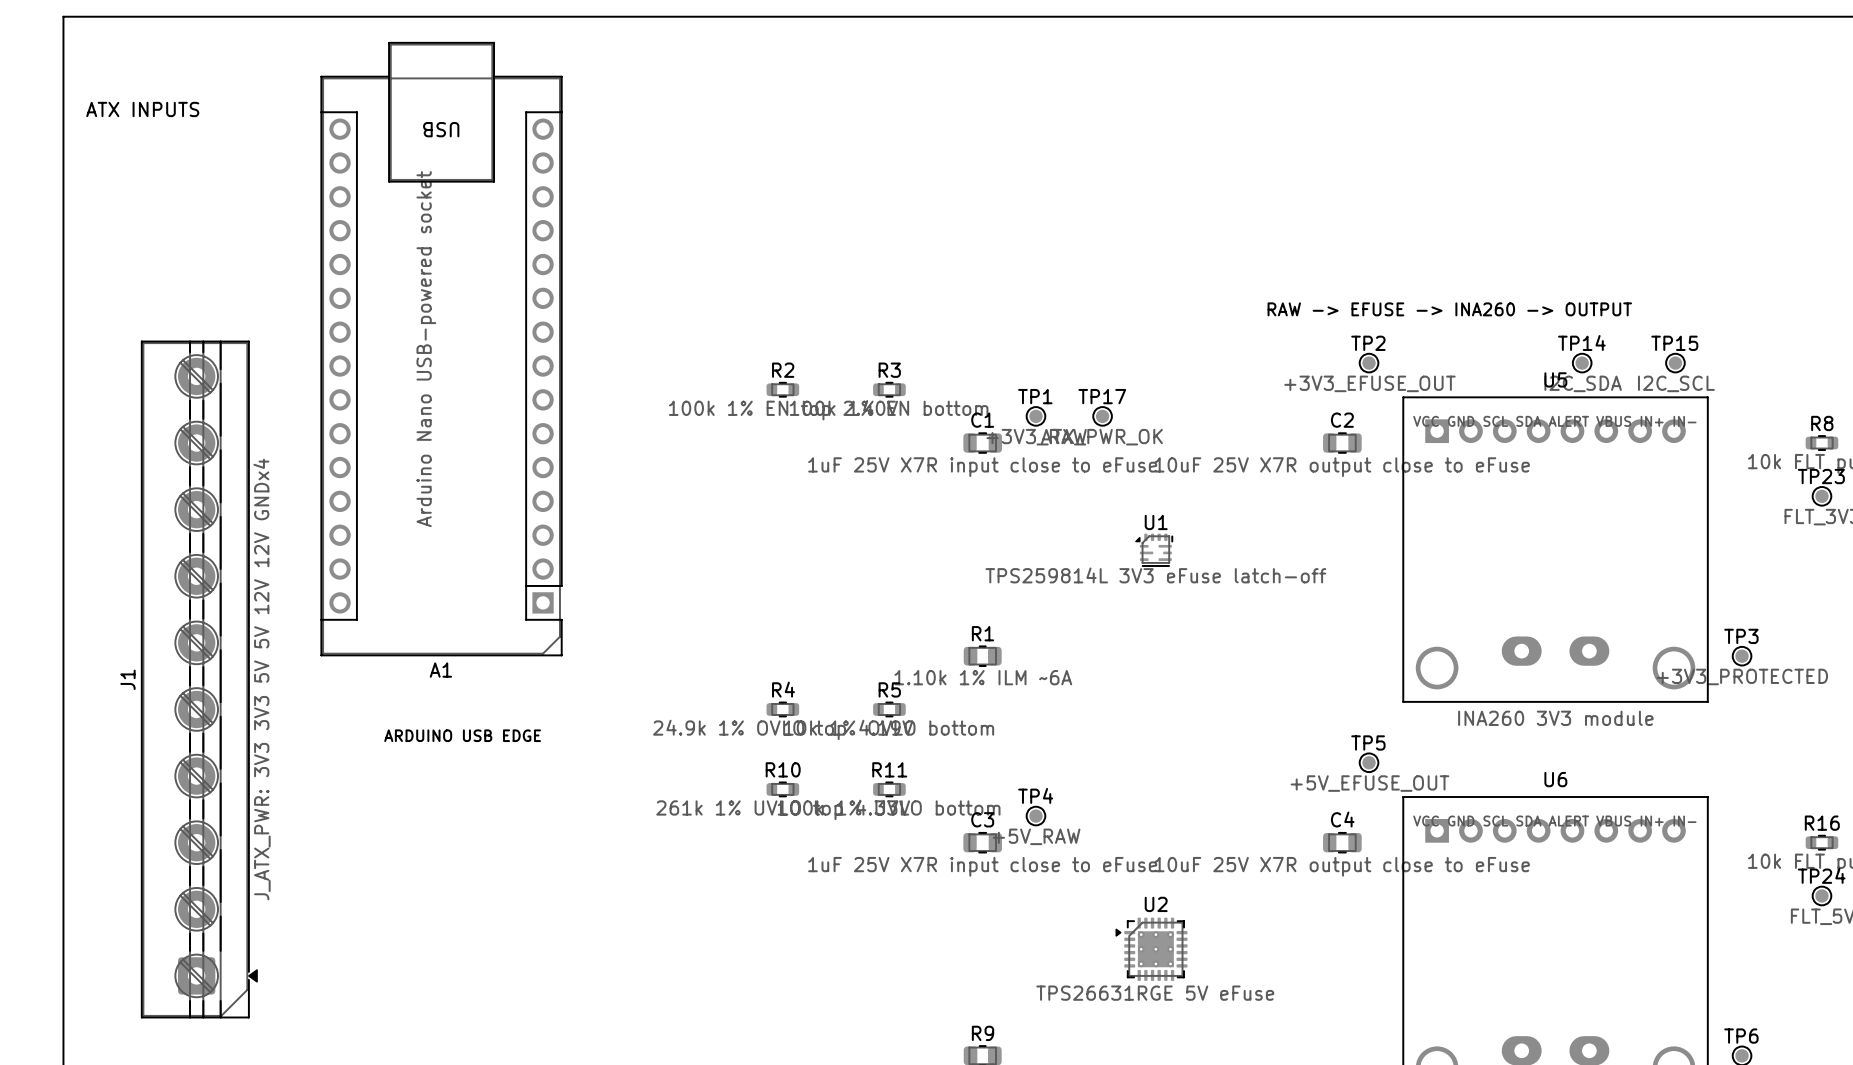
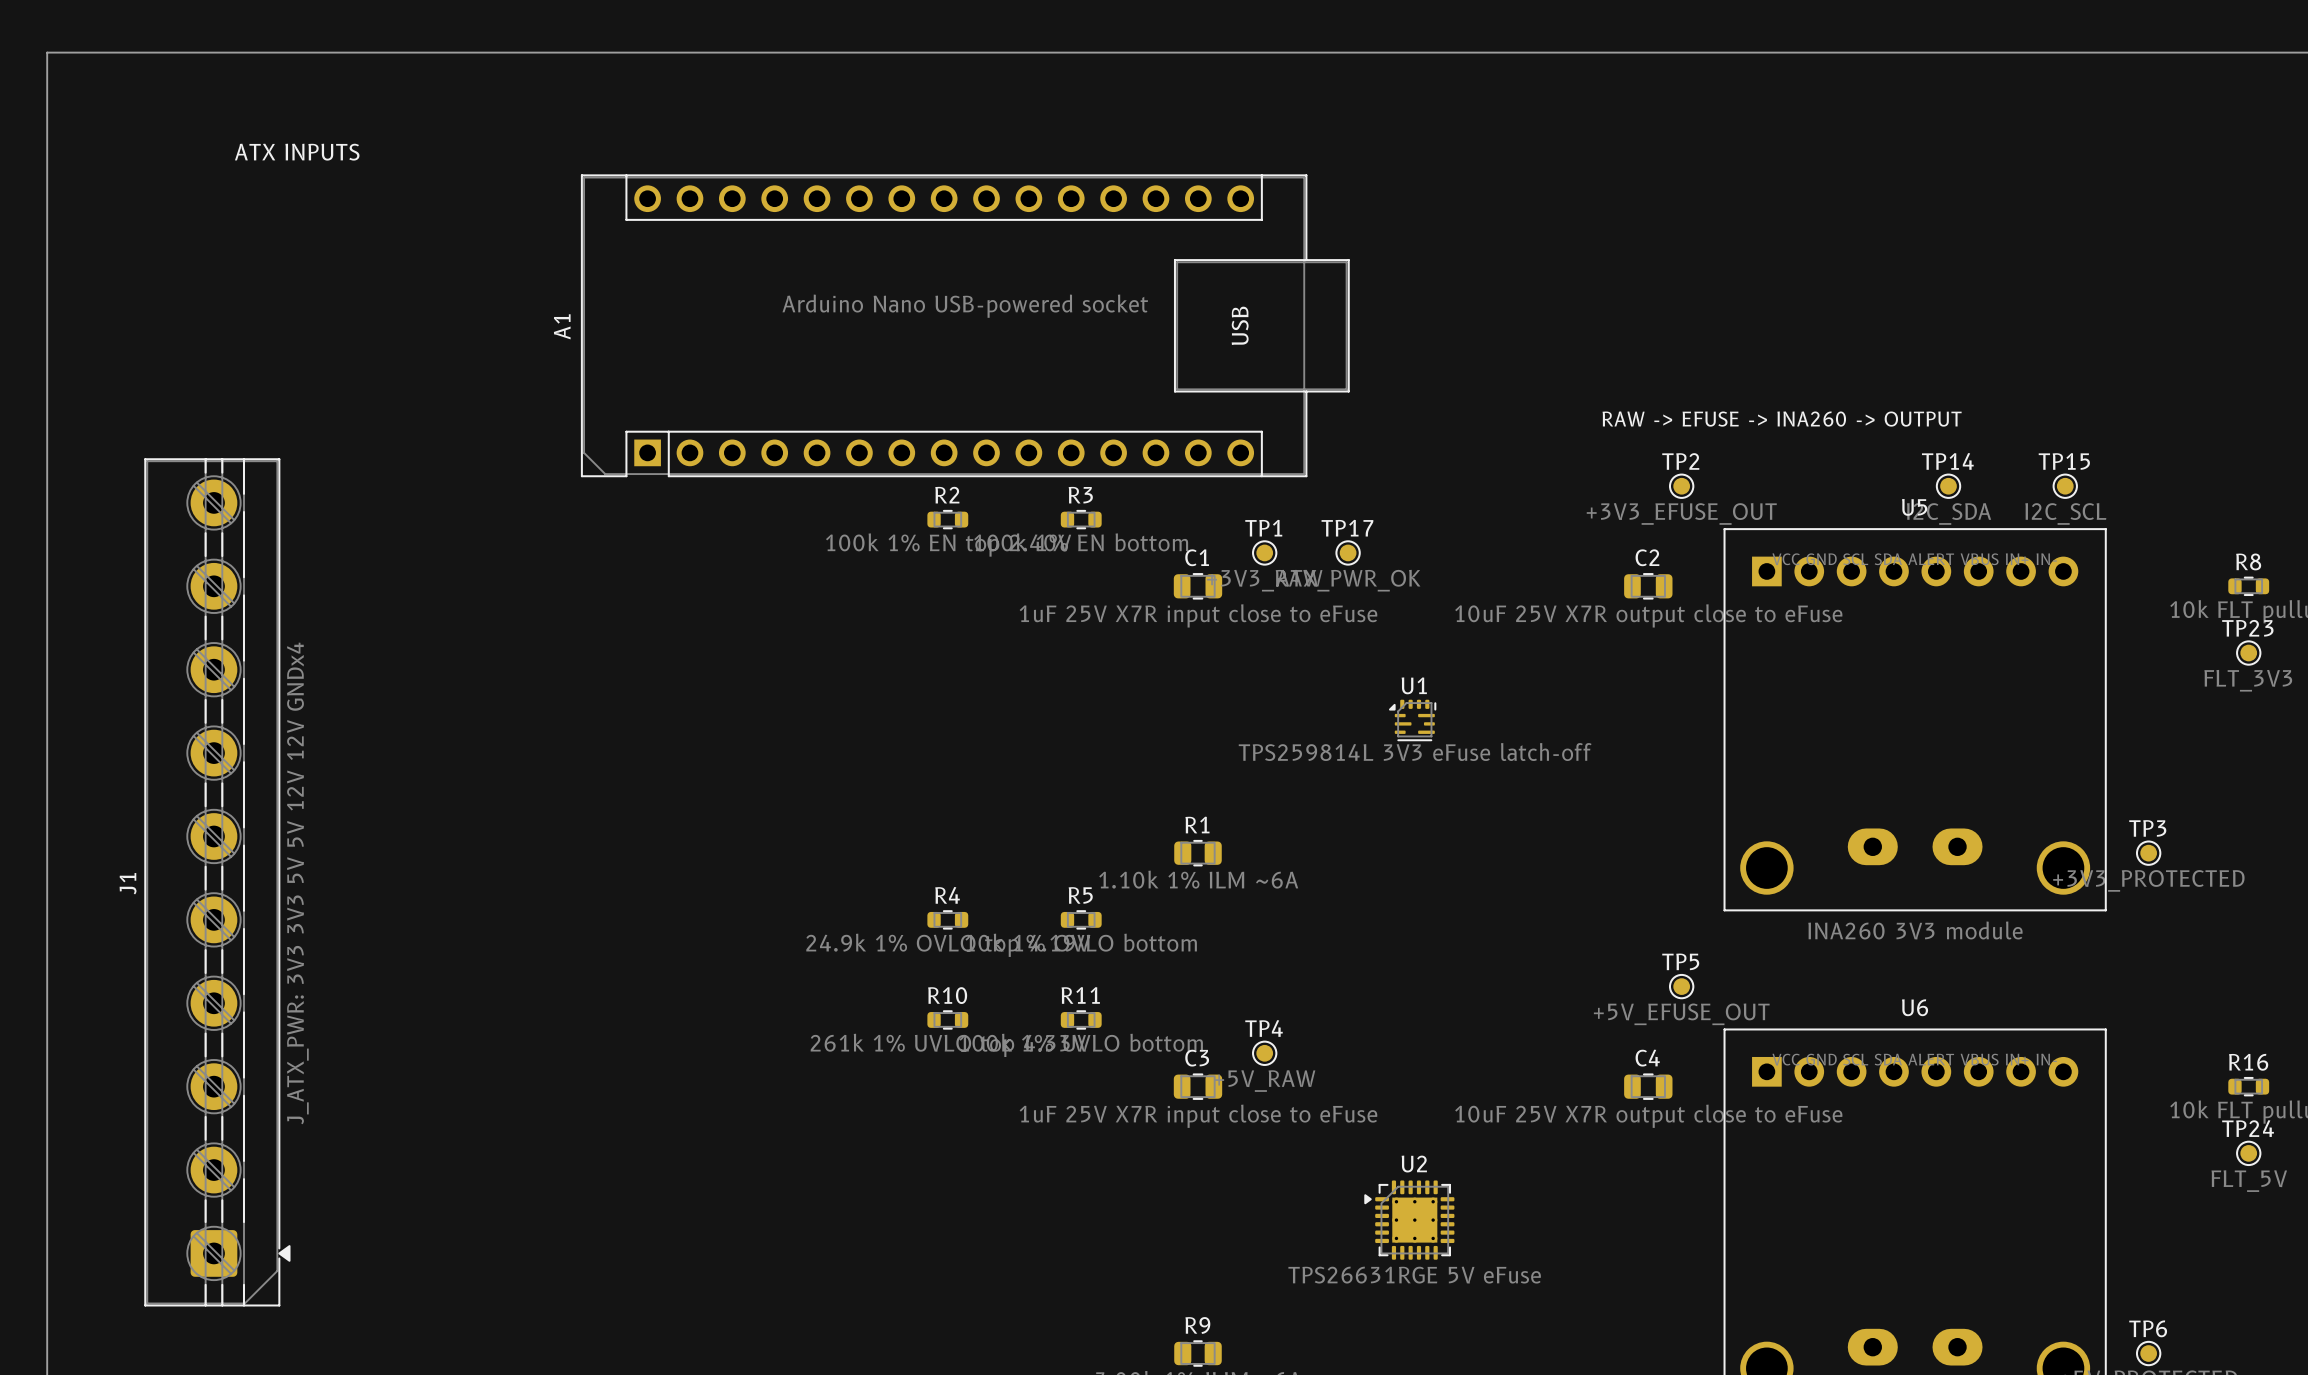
text position: ATX INPUTS (142, 109) -> ATX INPUTS (297, 152)
A1 rotation: 0° (441, 349) -> 90° clockwise (965, 325)
A1 position: (441, 349) -> (965, 325)
text: ARDUINO USB EDGE (462, 735) -> none

